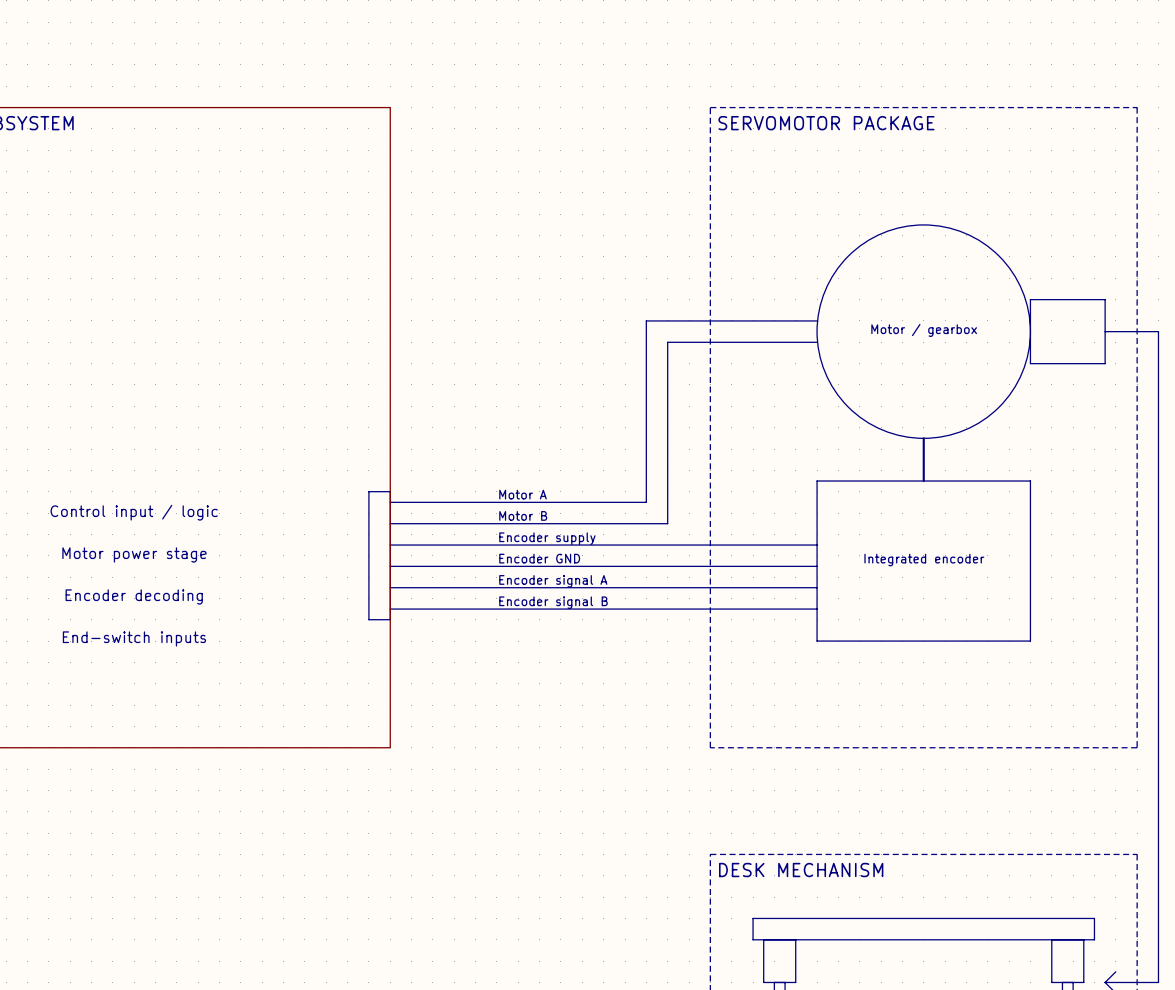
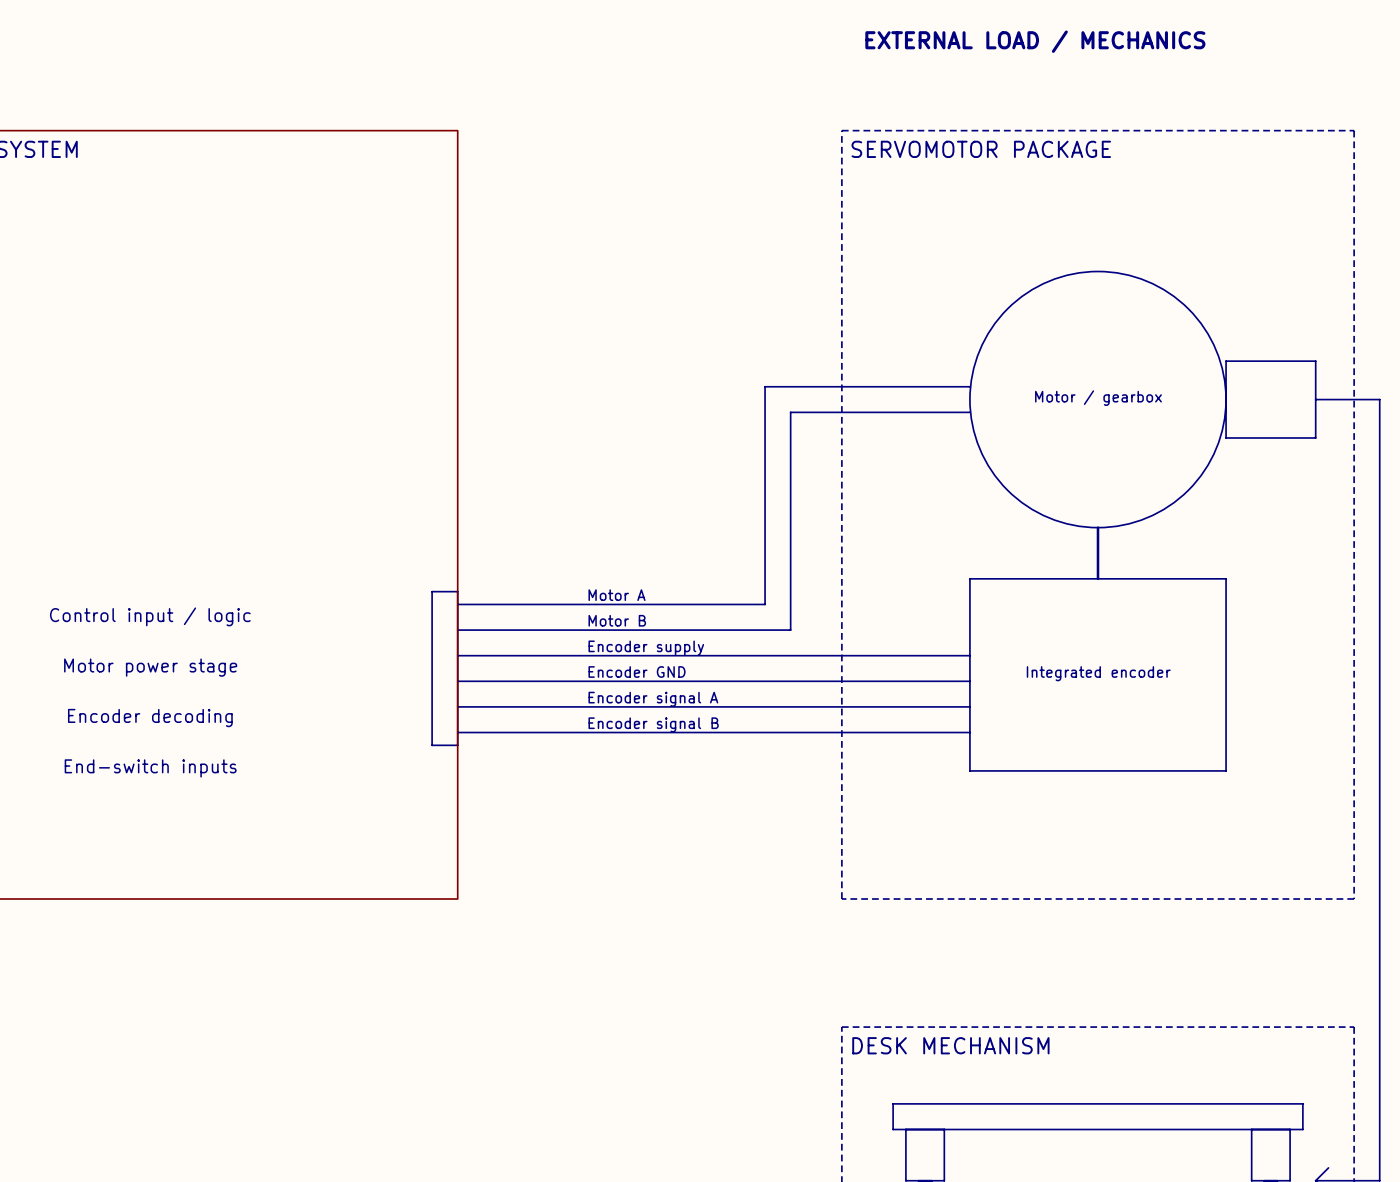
text: none -> EXTERNAL LOAD / MECHANICS (1035, 41)

